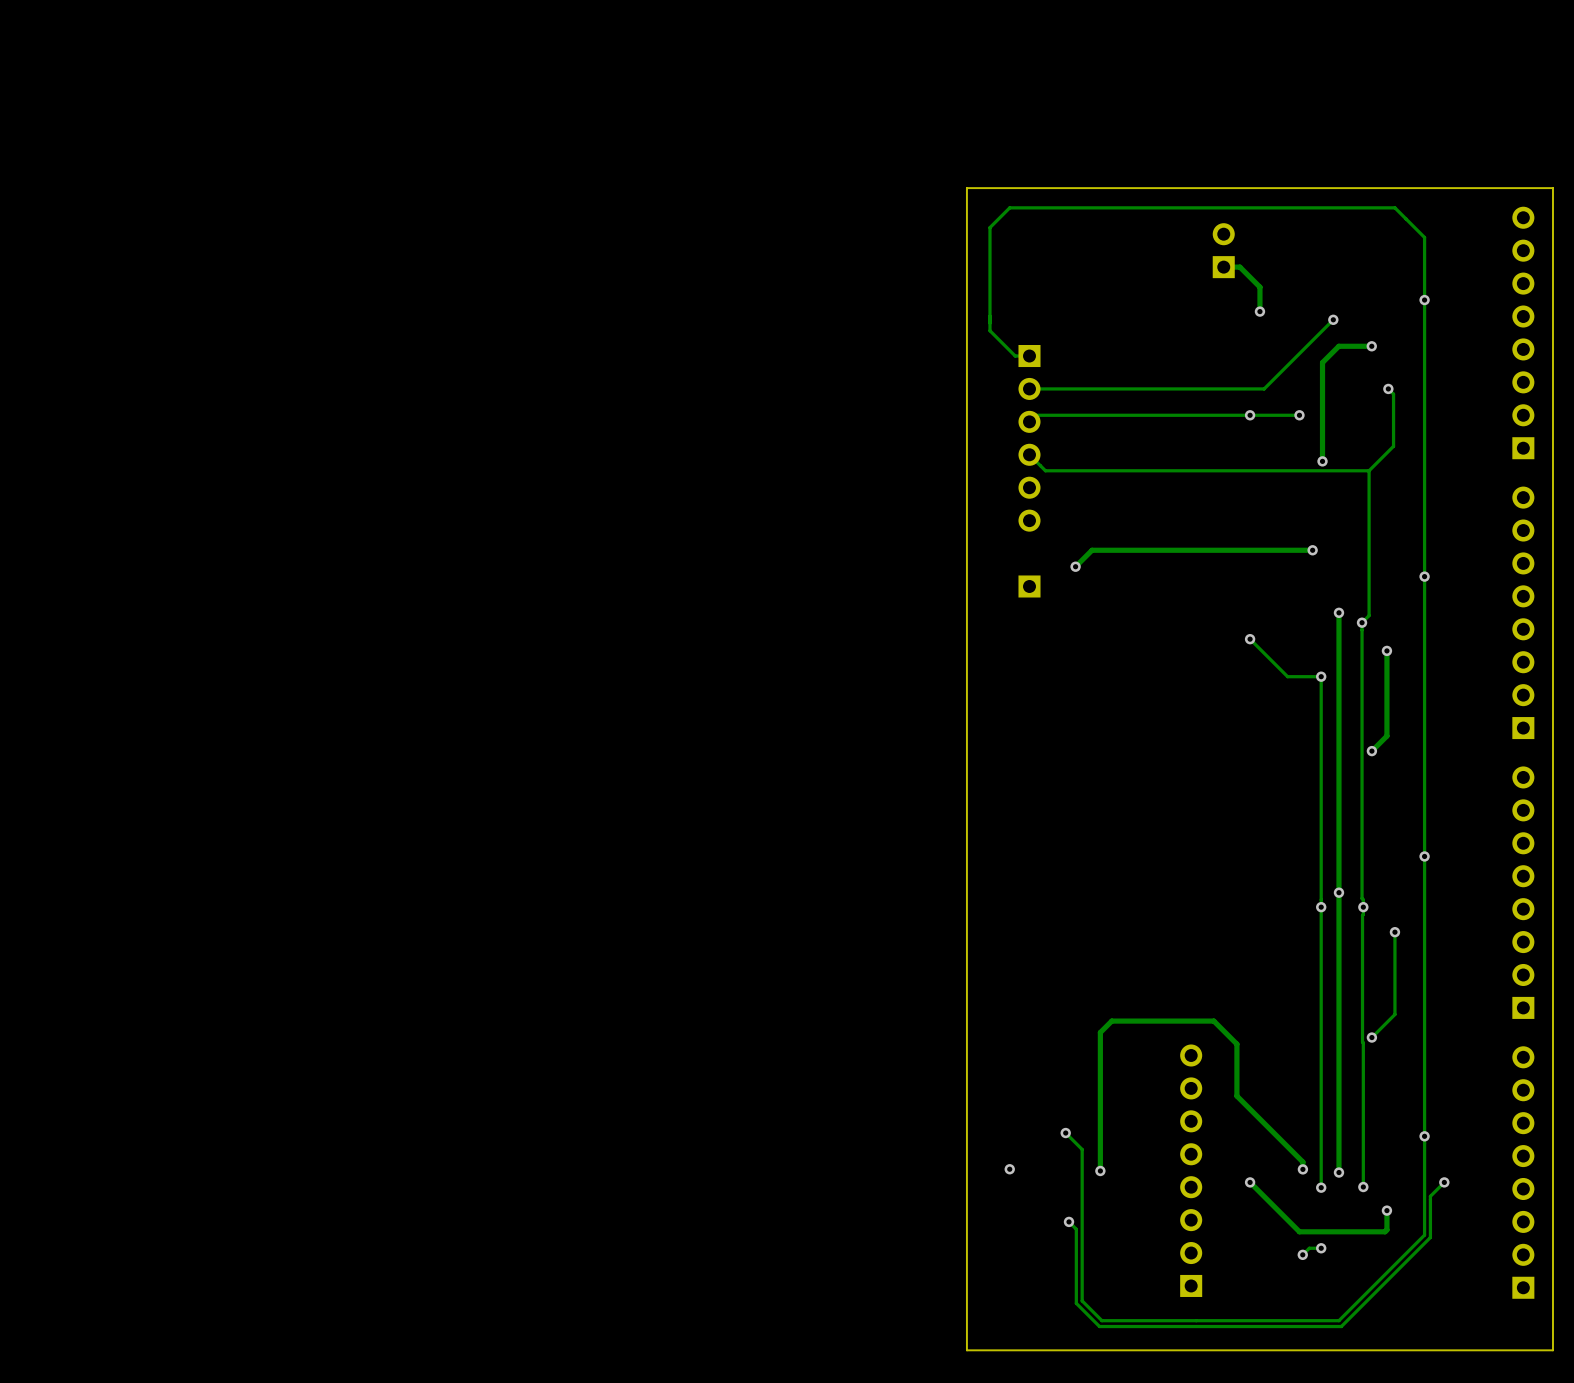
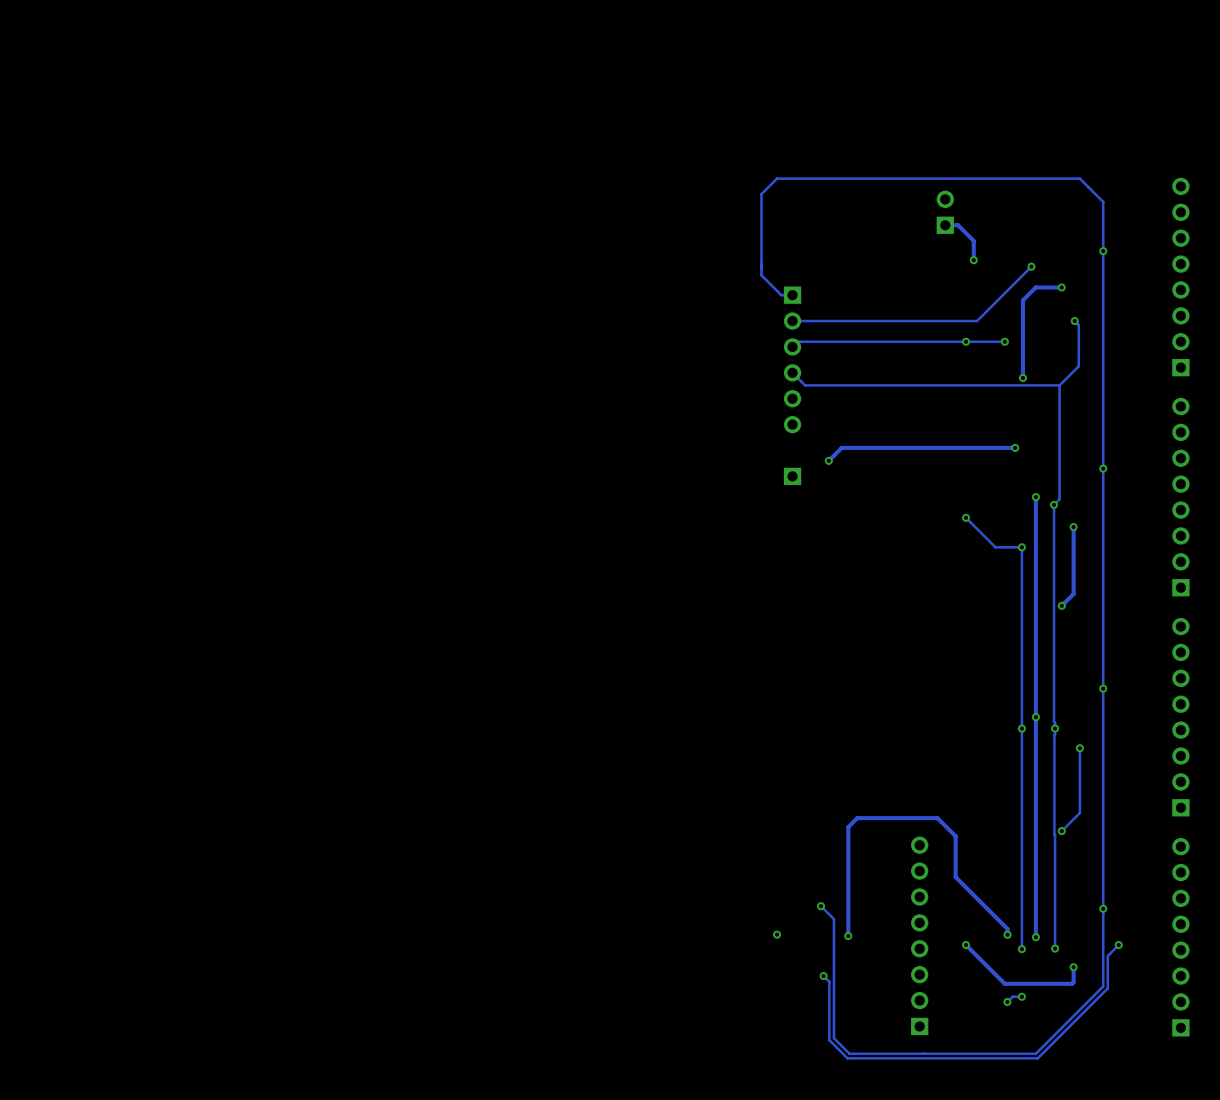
board edge: (1552, 188) (966, 188) (966, 1350) (1552, 1350) (1552, 188) -> none

